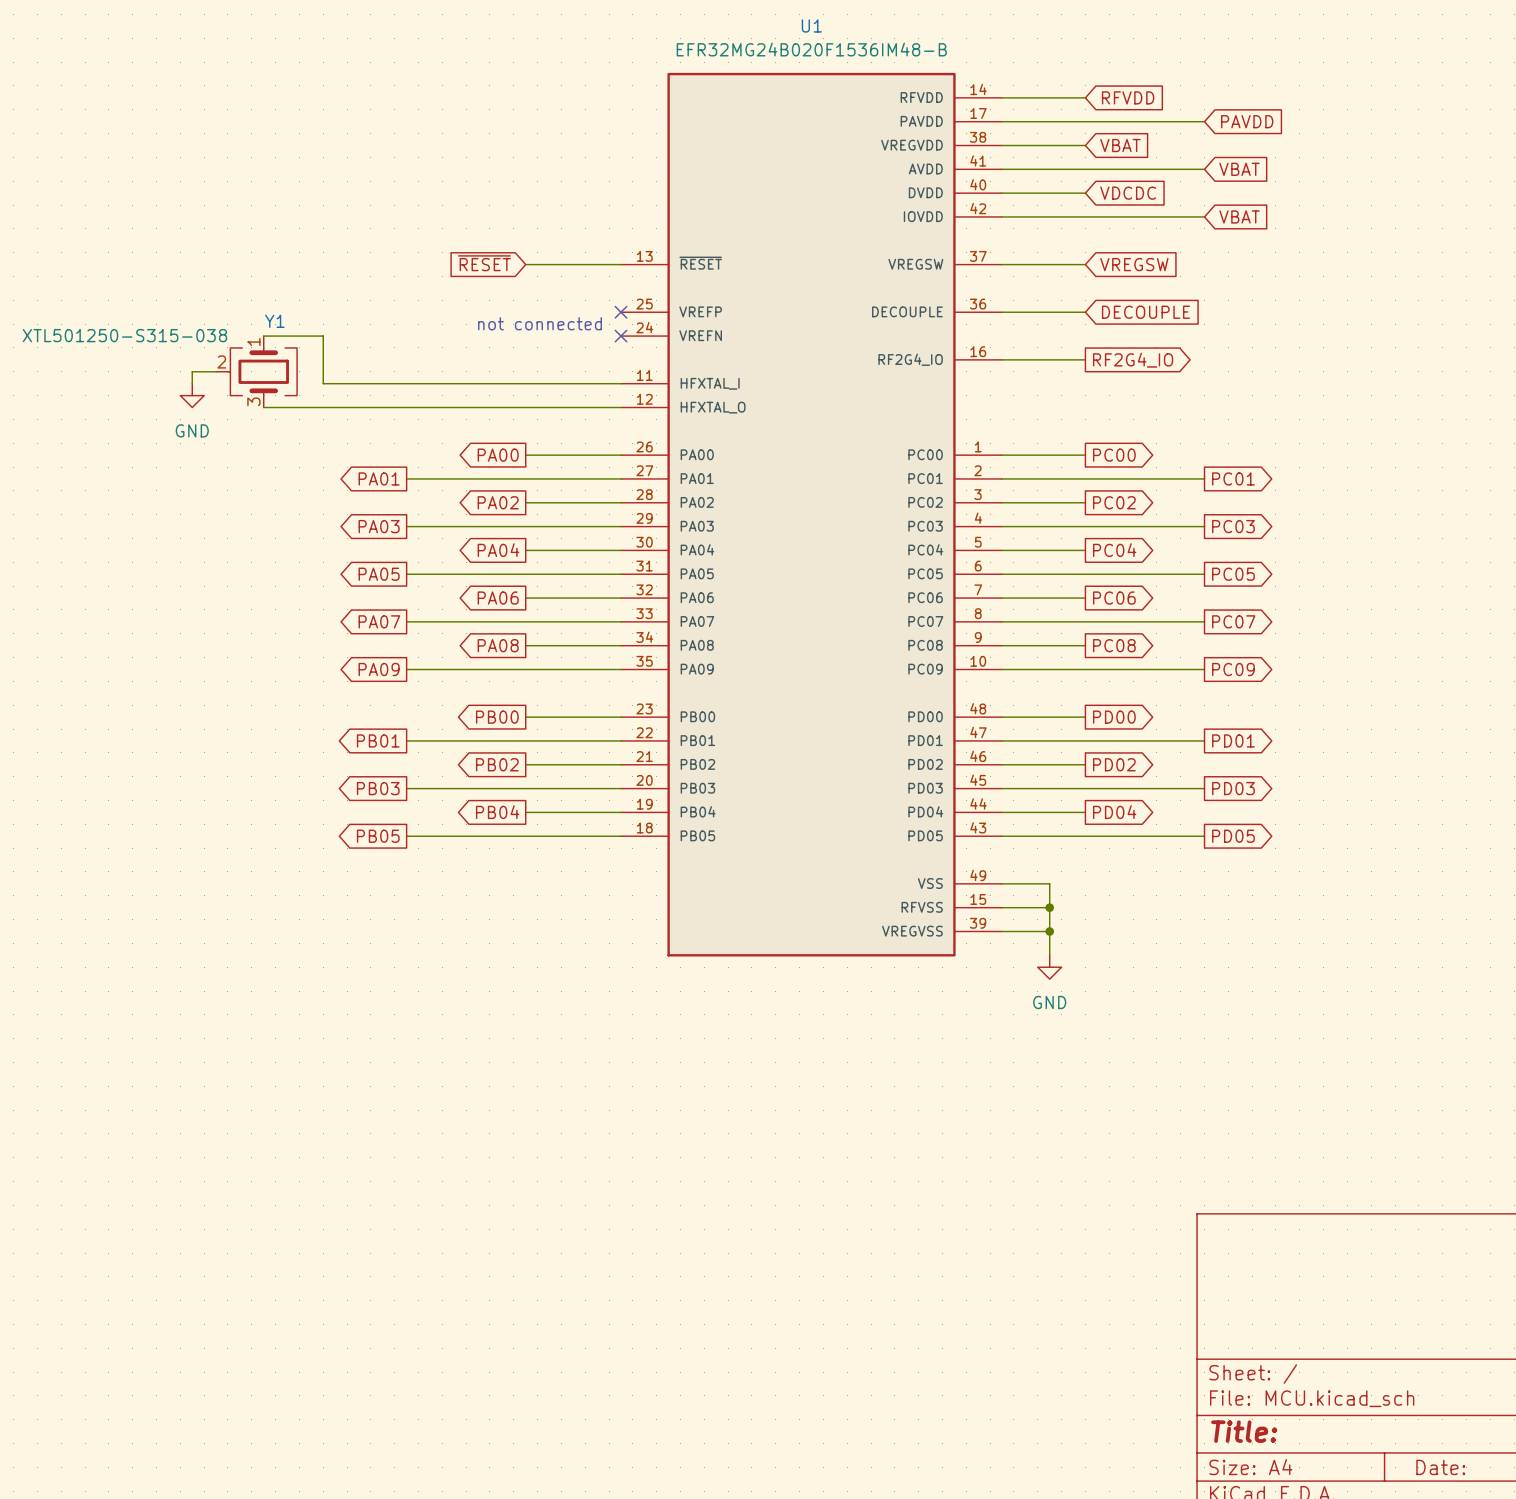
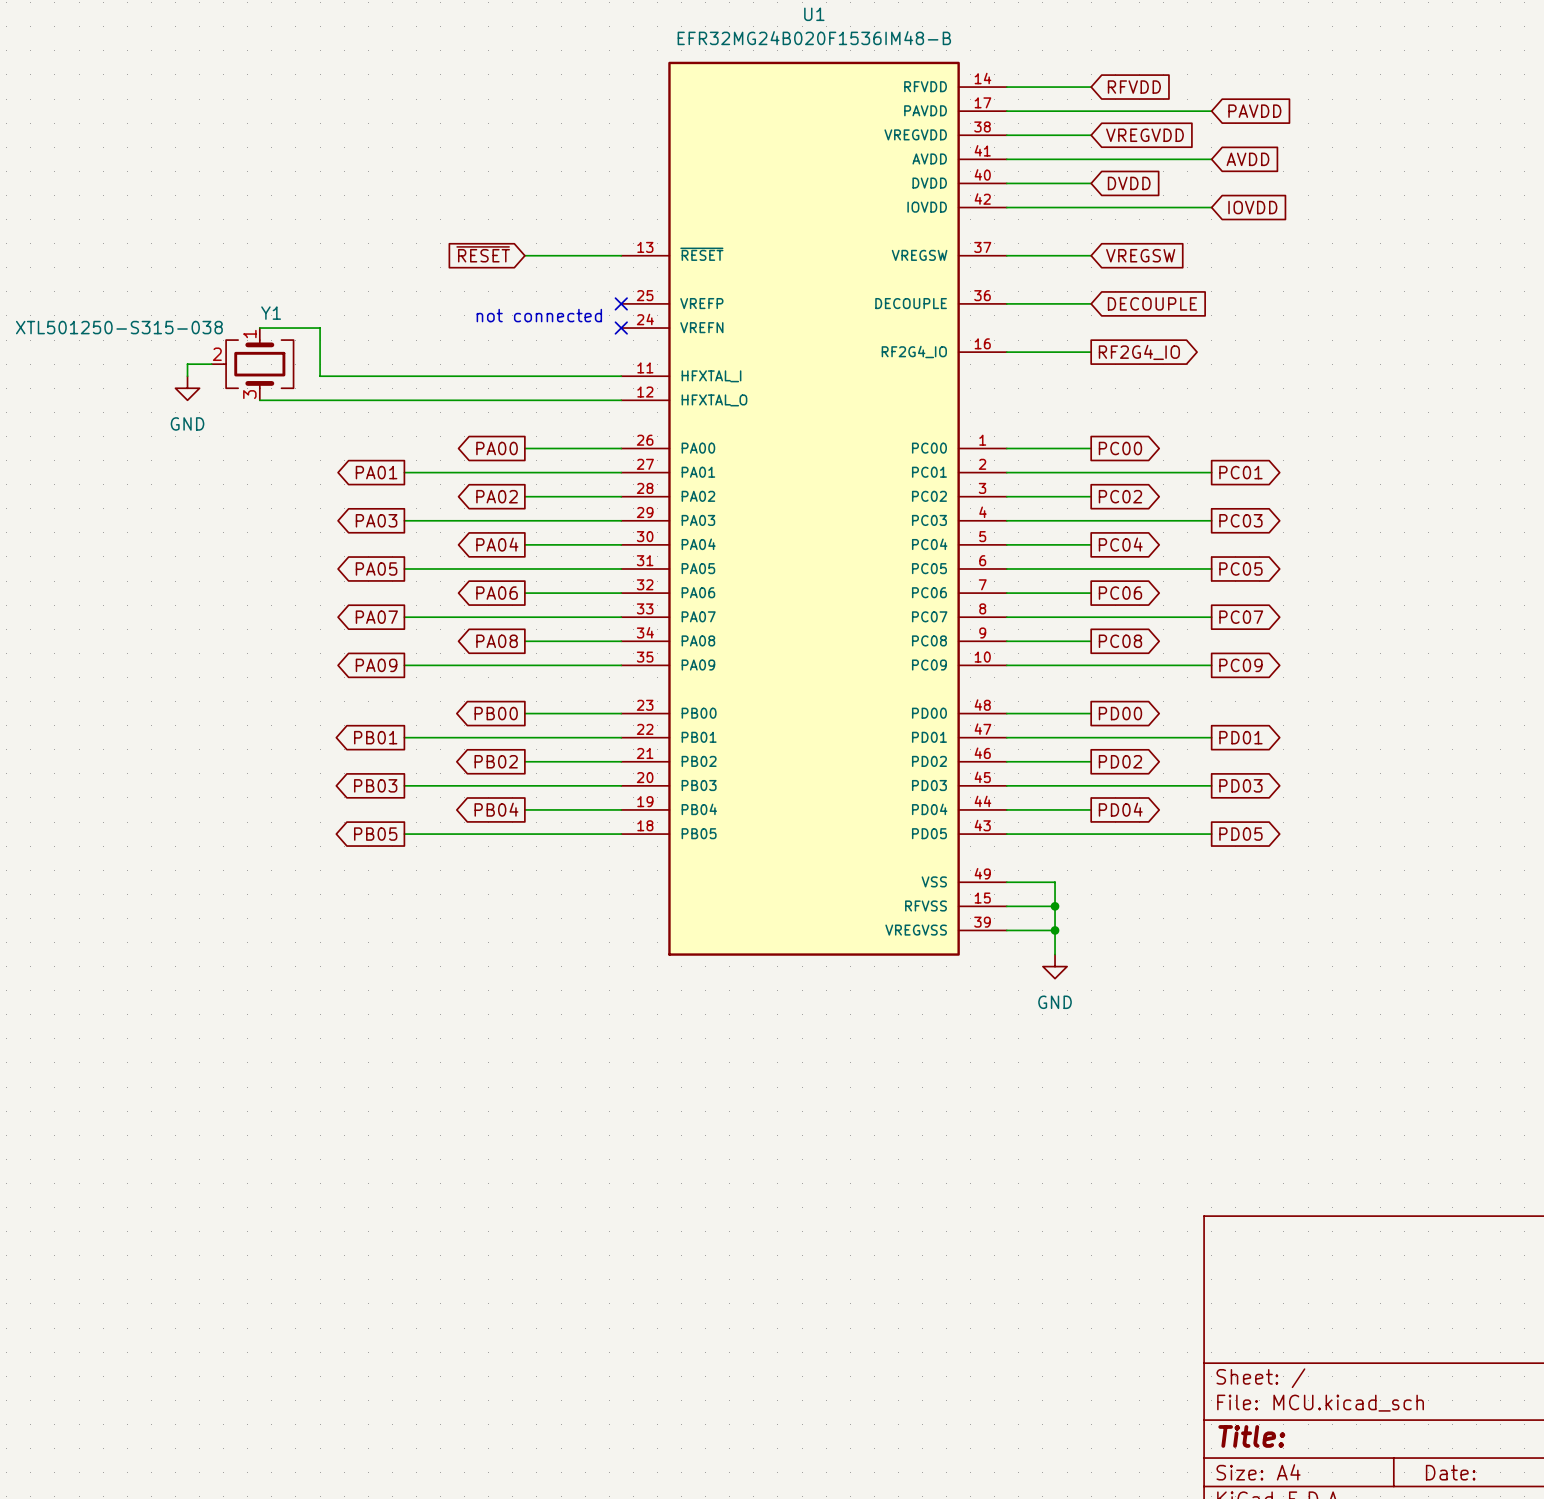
global label: VBAT (1120, 145) -> VREGVDD (1144, 135)
global label: VBAT (1239, 169) -> AVDD (1247, 159)
global label: VDCDC (1128, 193) -> DVDD (1129, 183)
global label: VBAT (1239, 216) -> IOVDD (1252, 207)

